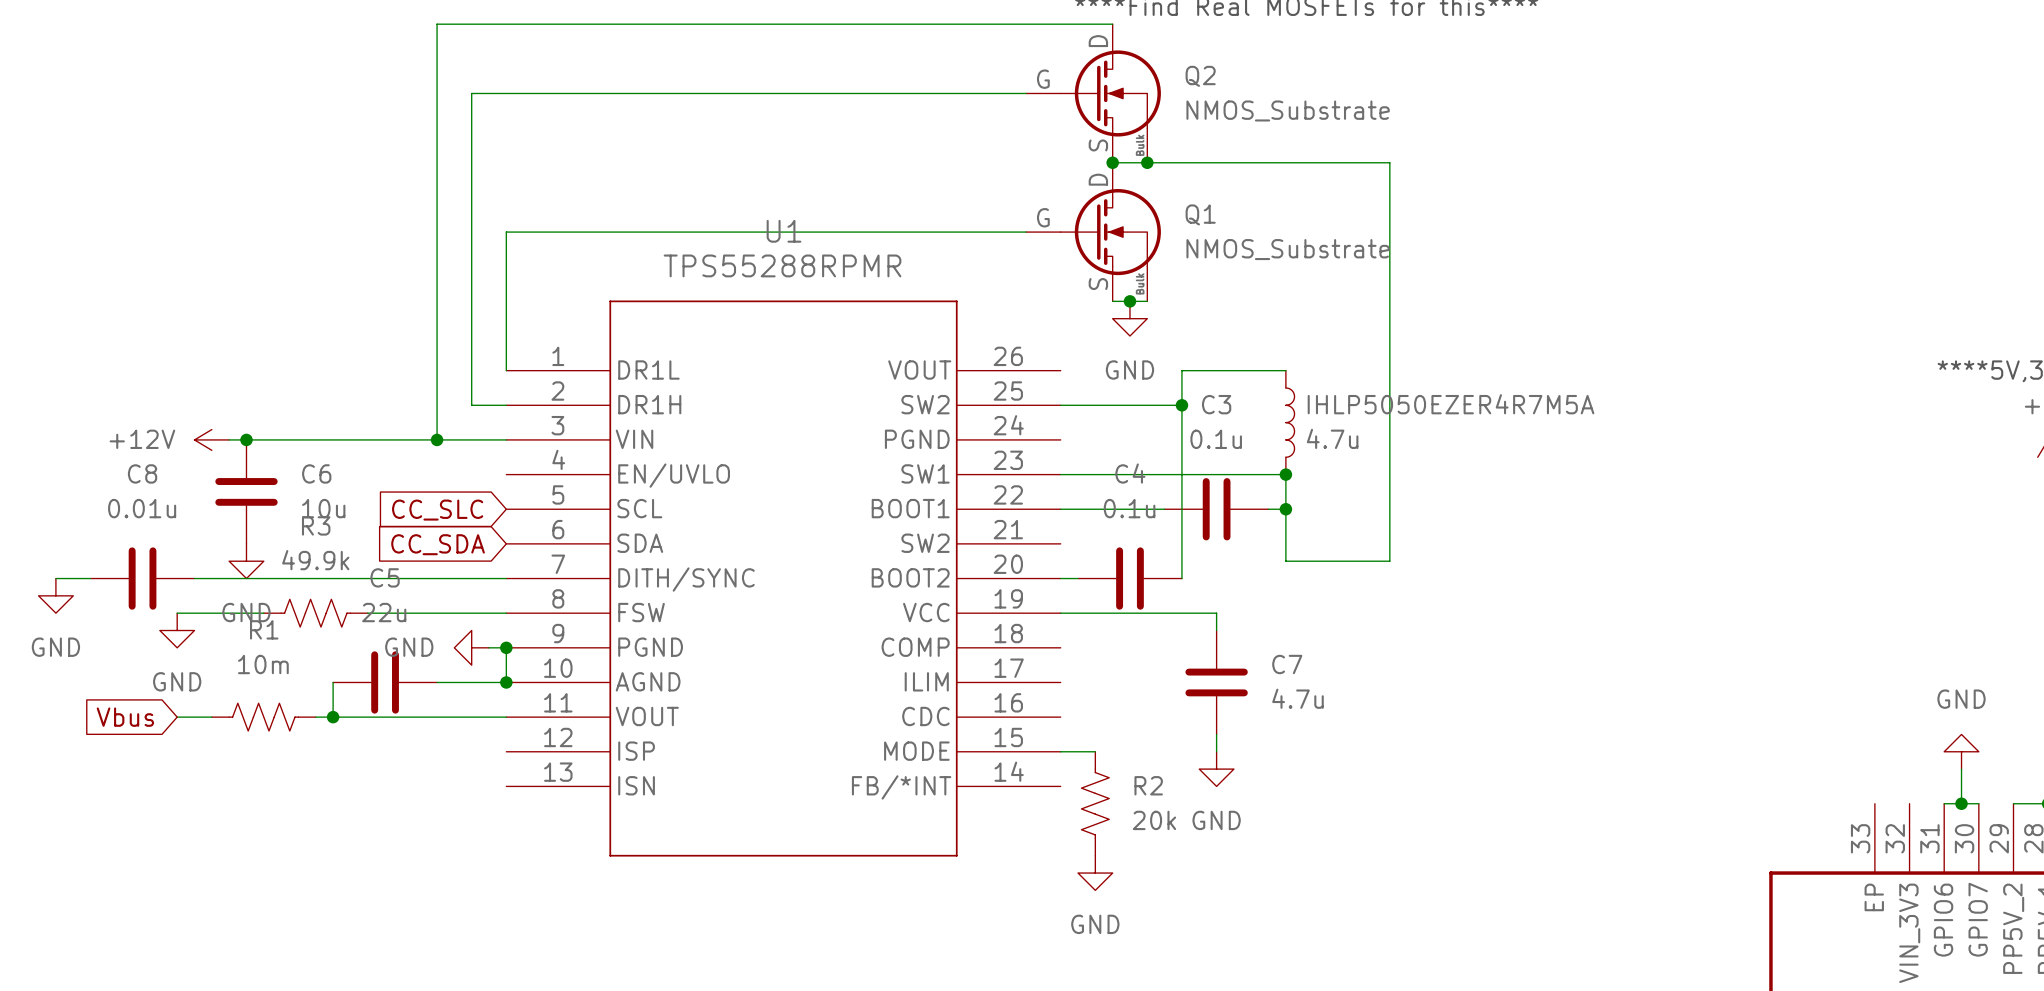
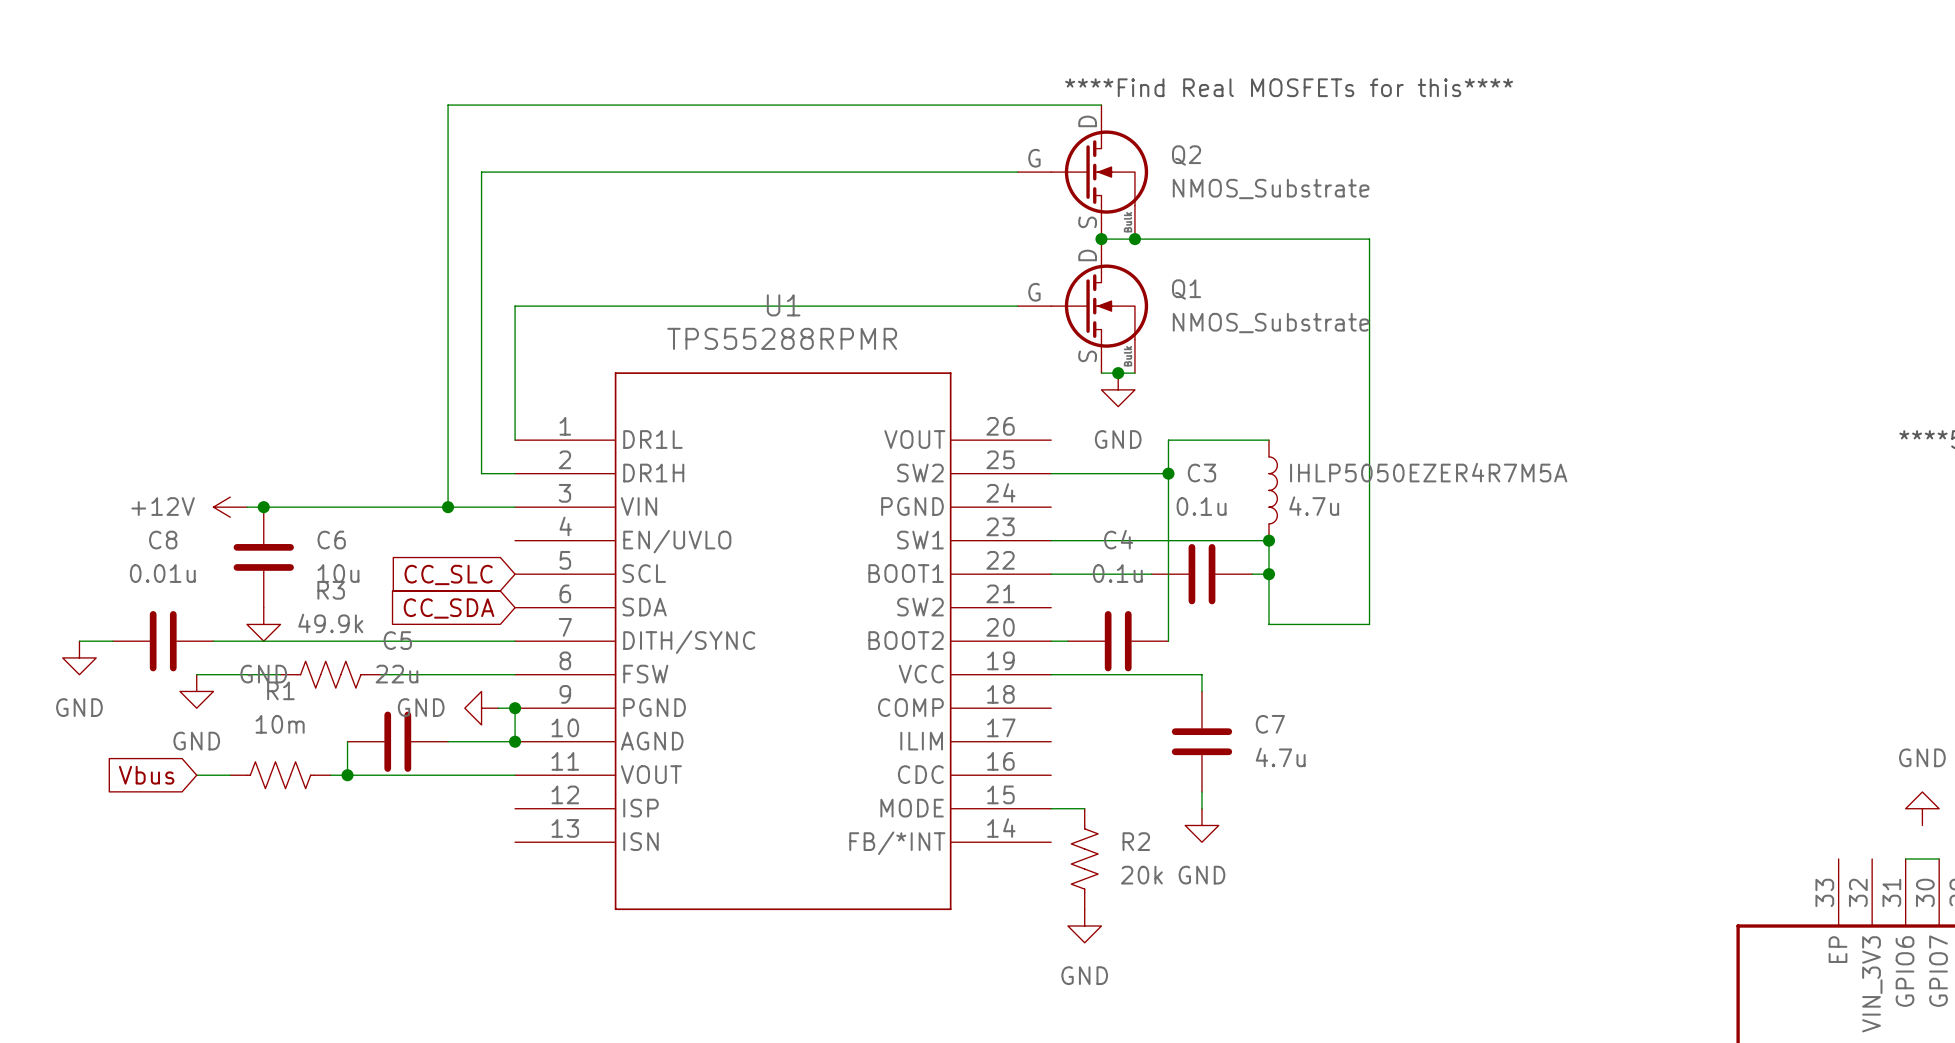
wire: (1961, 769) (1961, 803) -> none
junction: (1961, 803) -> none

